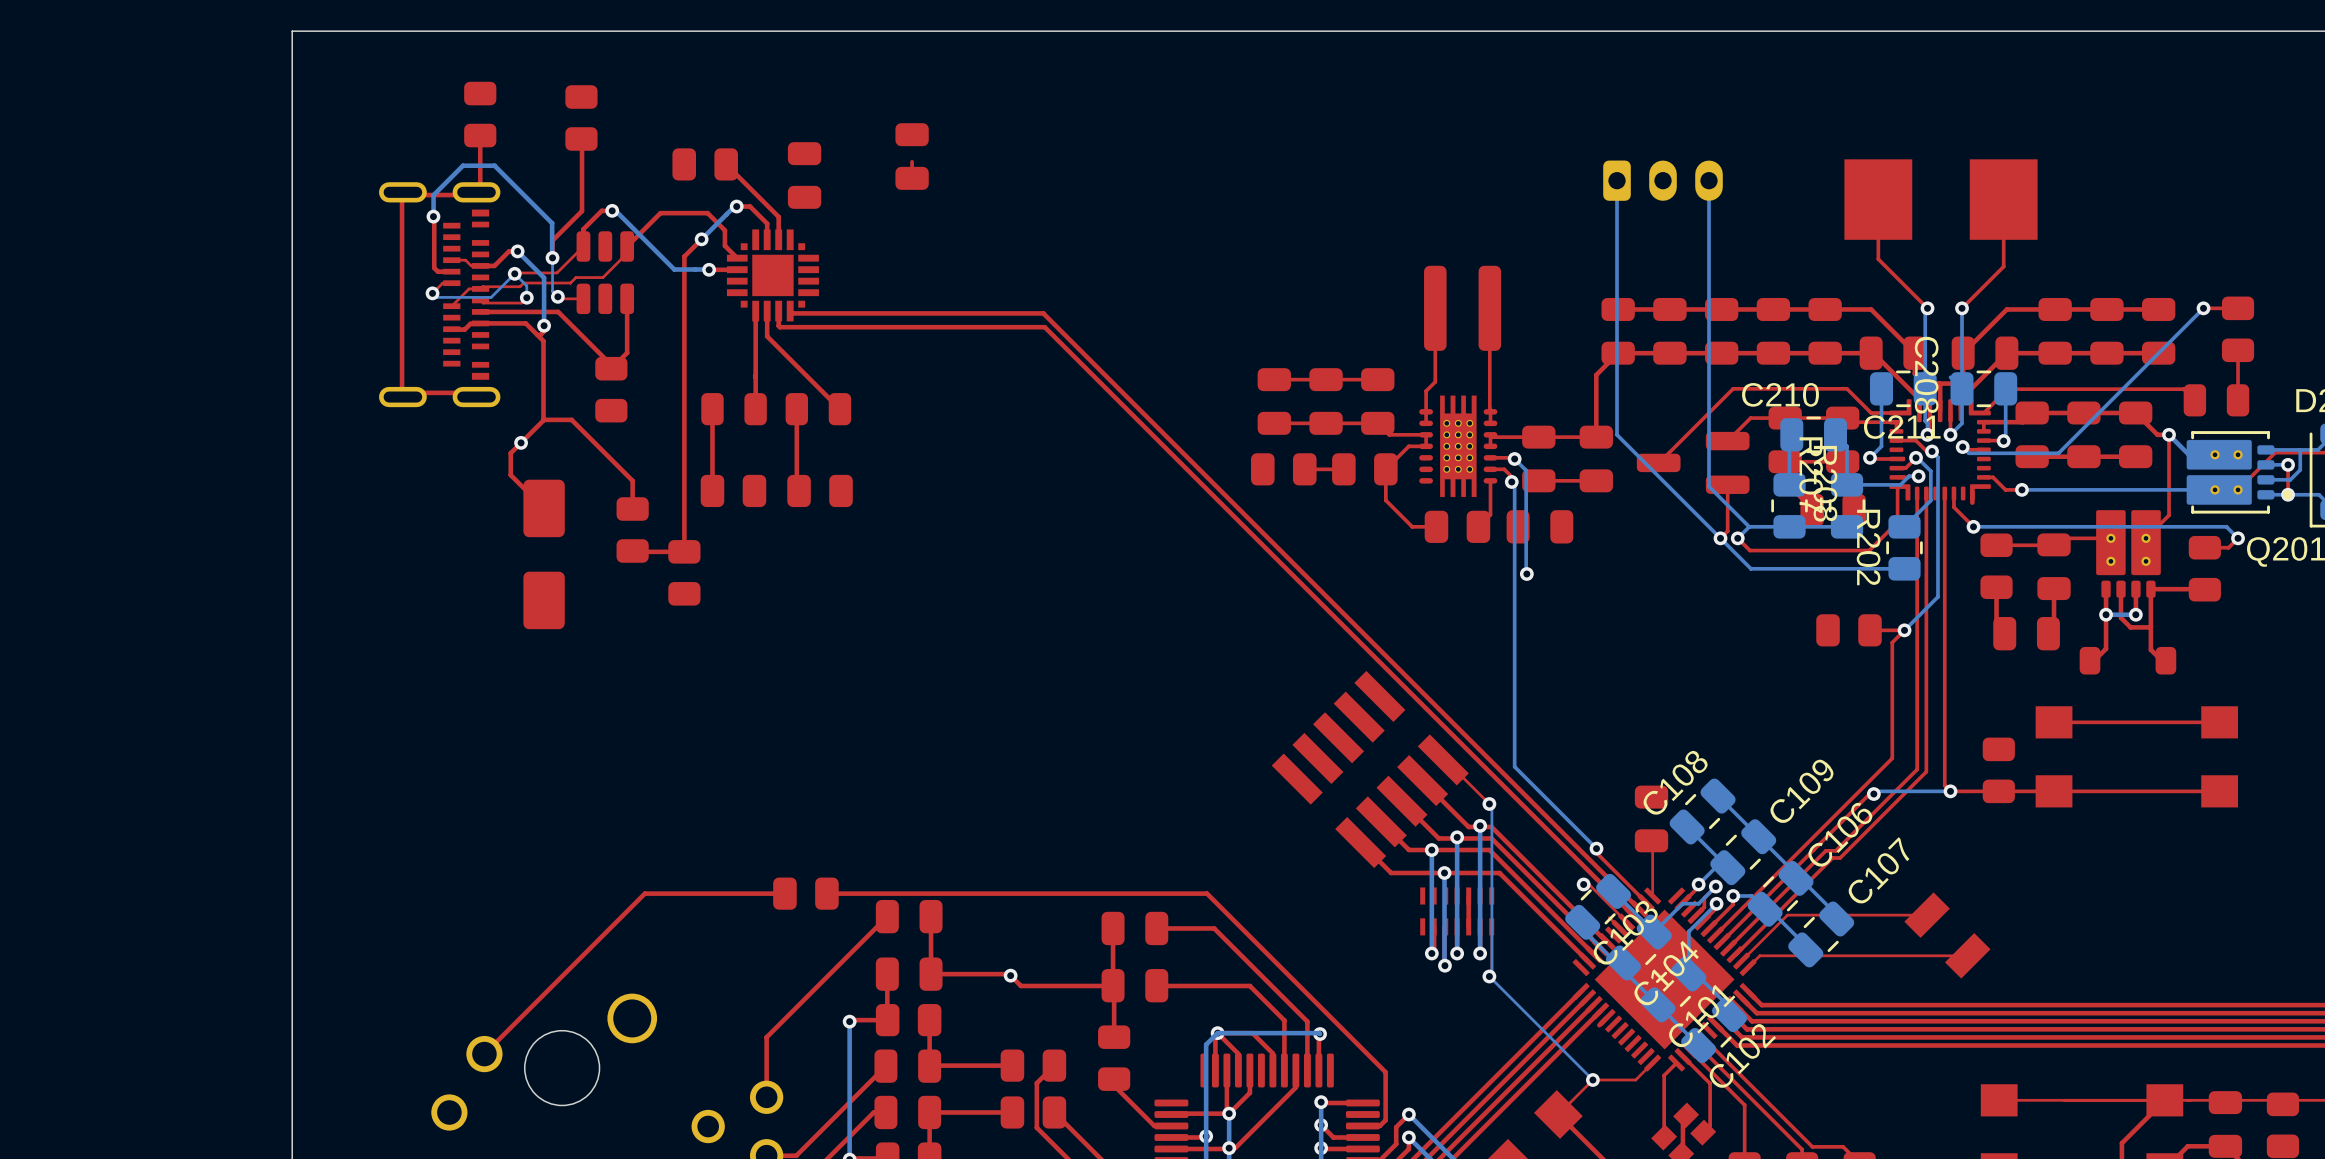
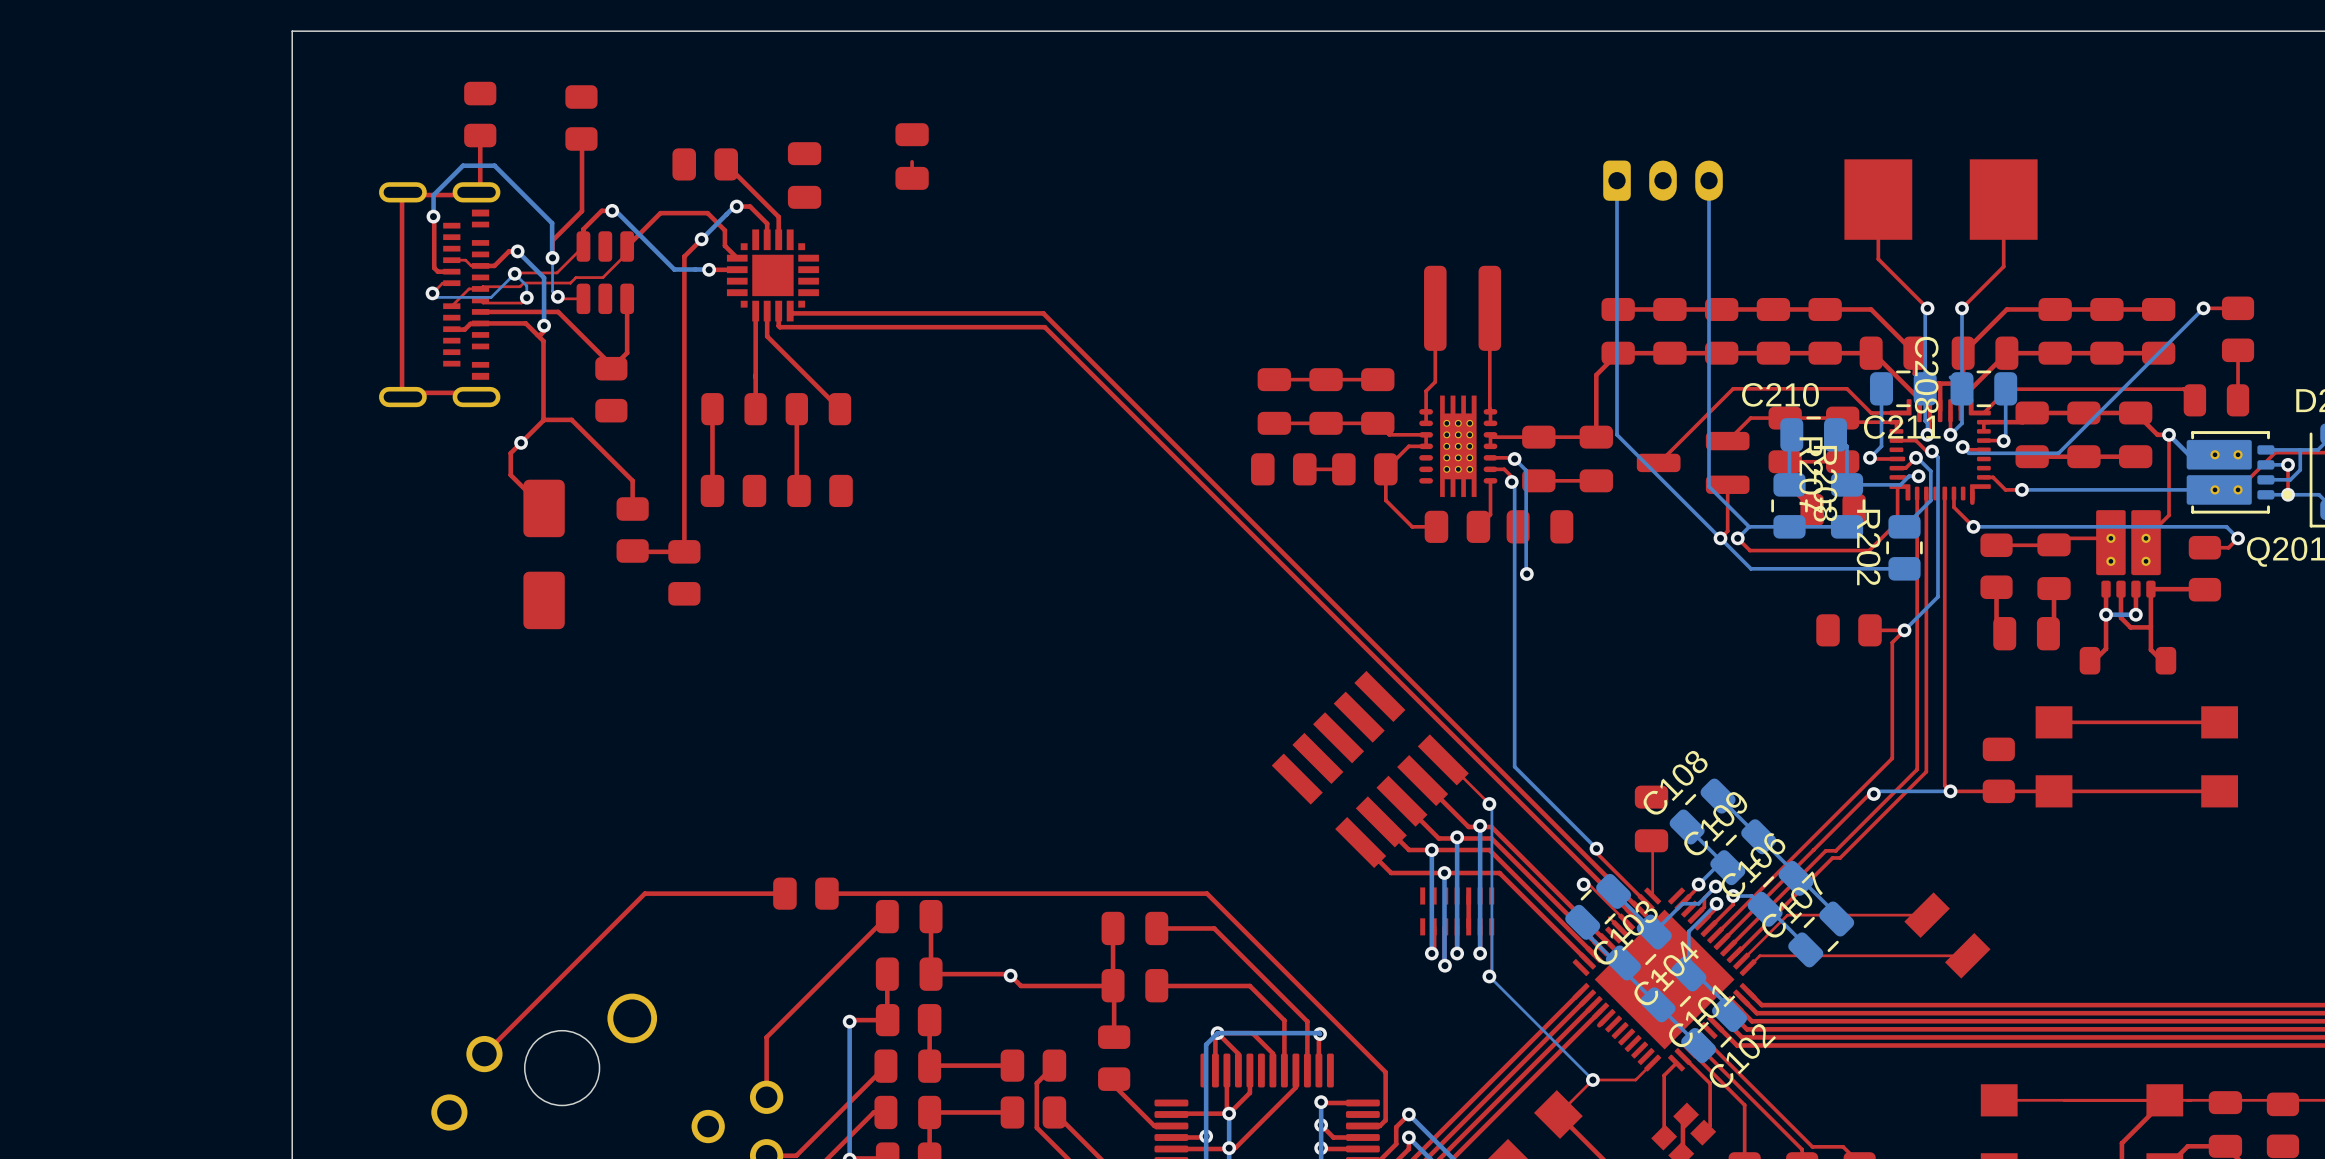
C109 name position: C109 (1802, 791) -> C109 (1715, 823)
C106 name position: C106 (1840, 834) -> C106 (1753, 864)
C107 name position: C107 (1879, 870) -> C107 (1792, 904)

